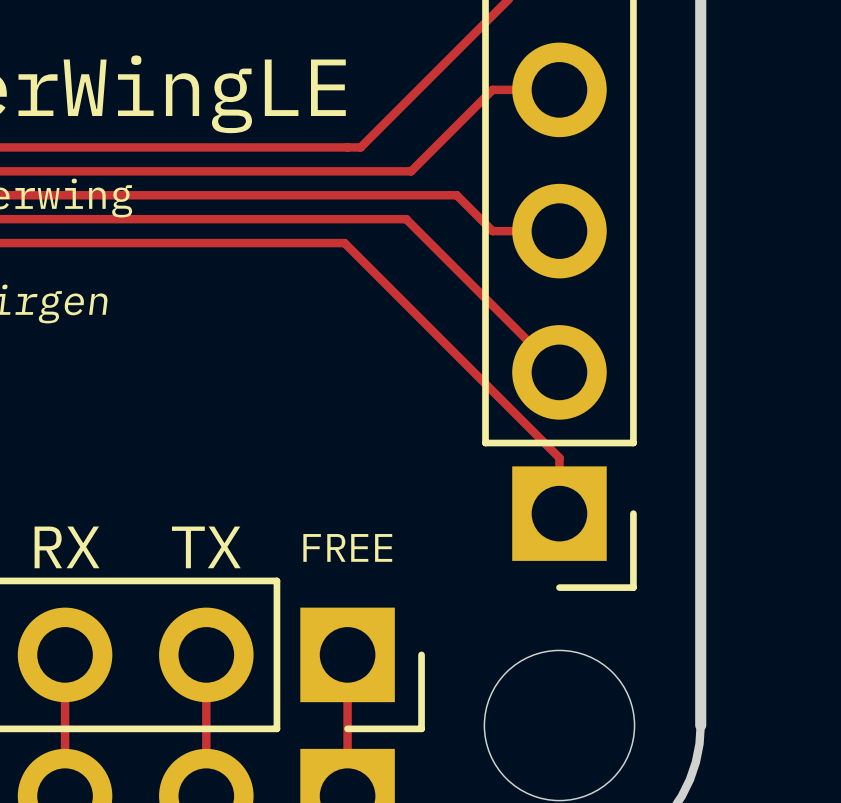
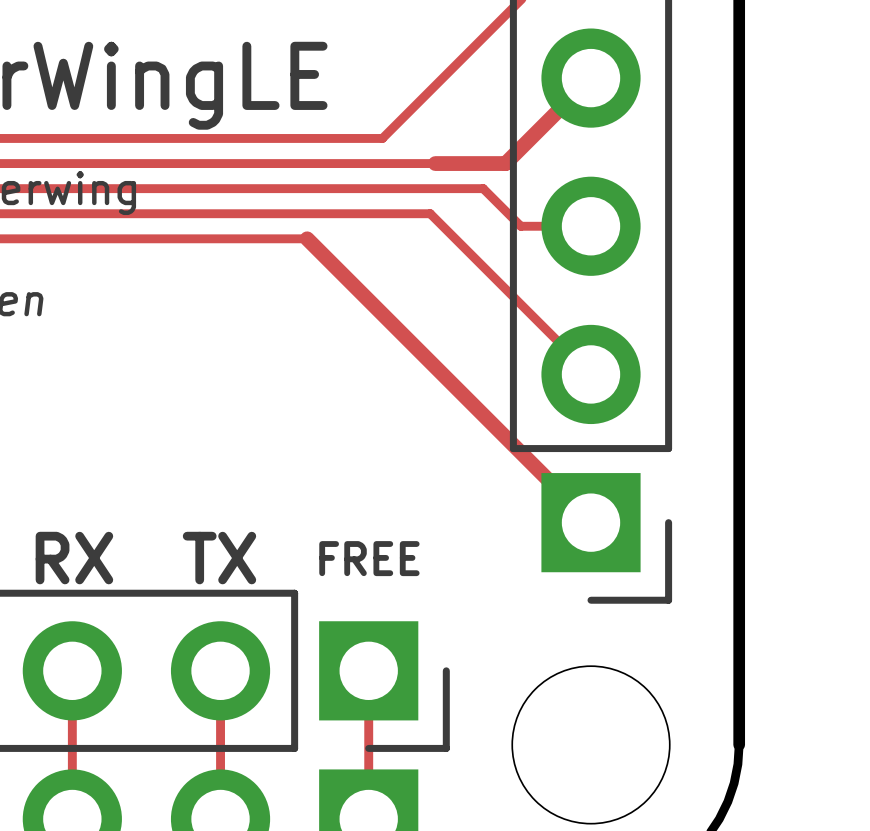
track: (559, 89) (492, 89) (411, 171) -> (591, 78) (505, 163) (435, 163)
track: (288, 243) (344, 243) (559, 457) (559, 513) -> (307, 238) (591, 522)

